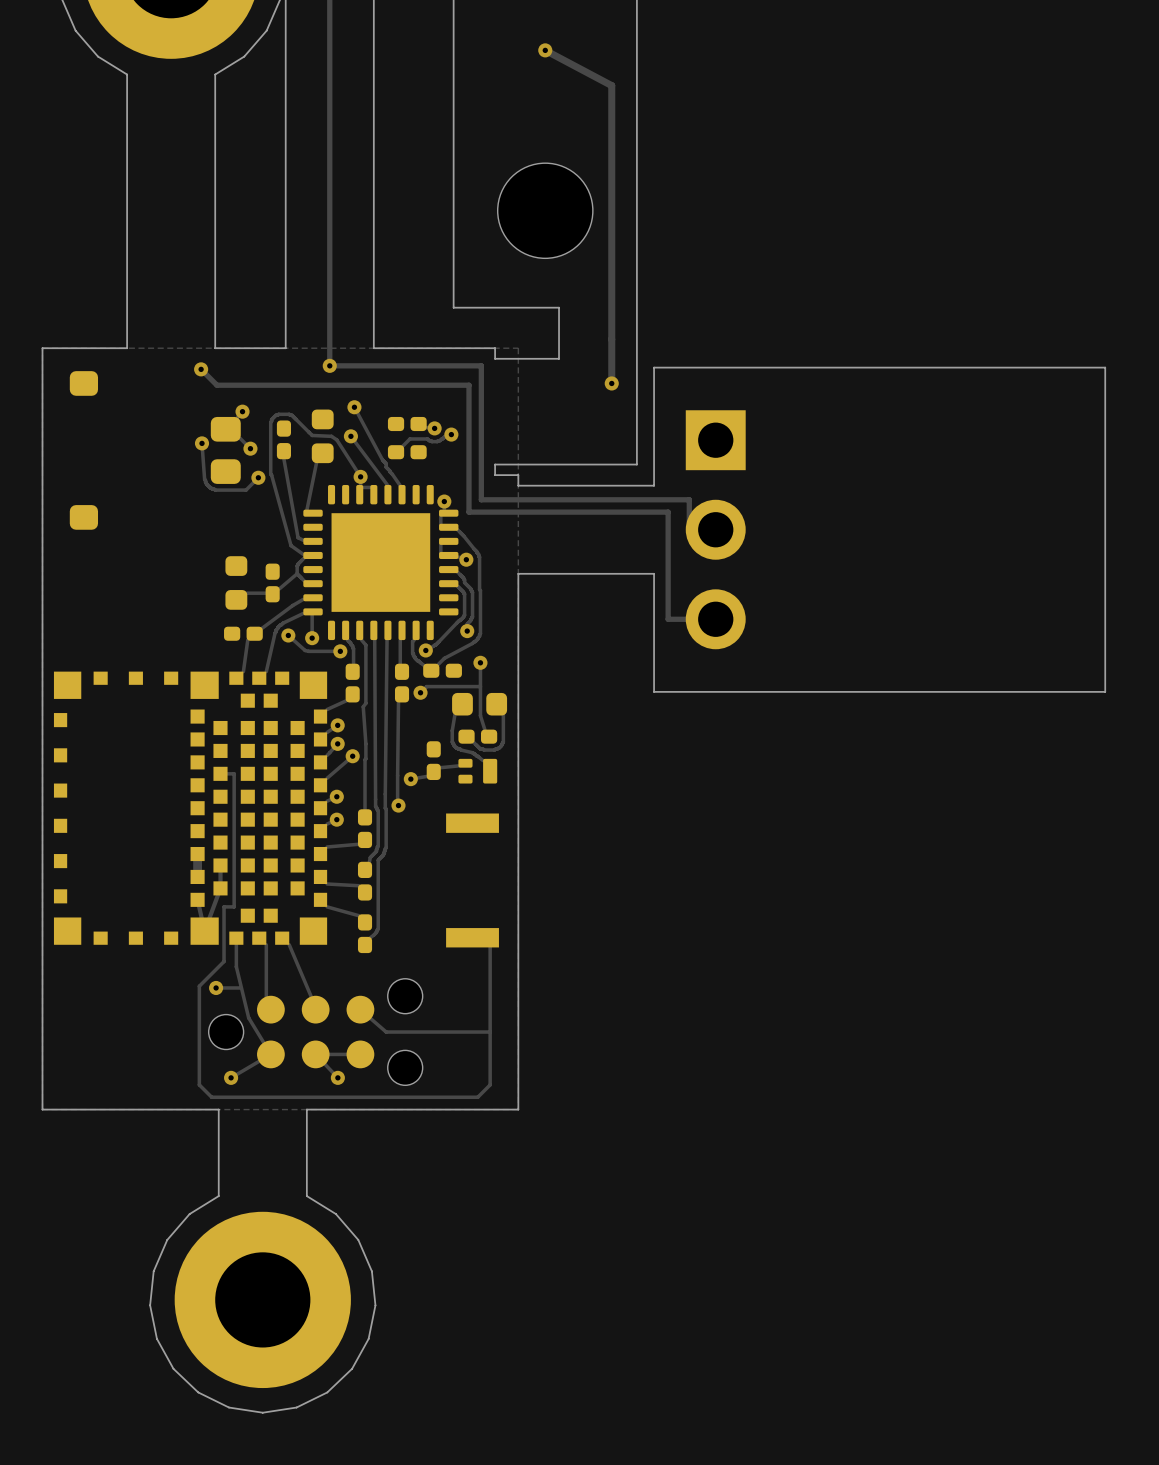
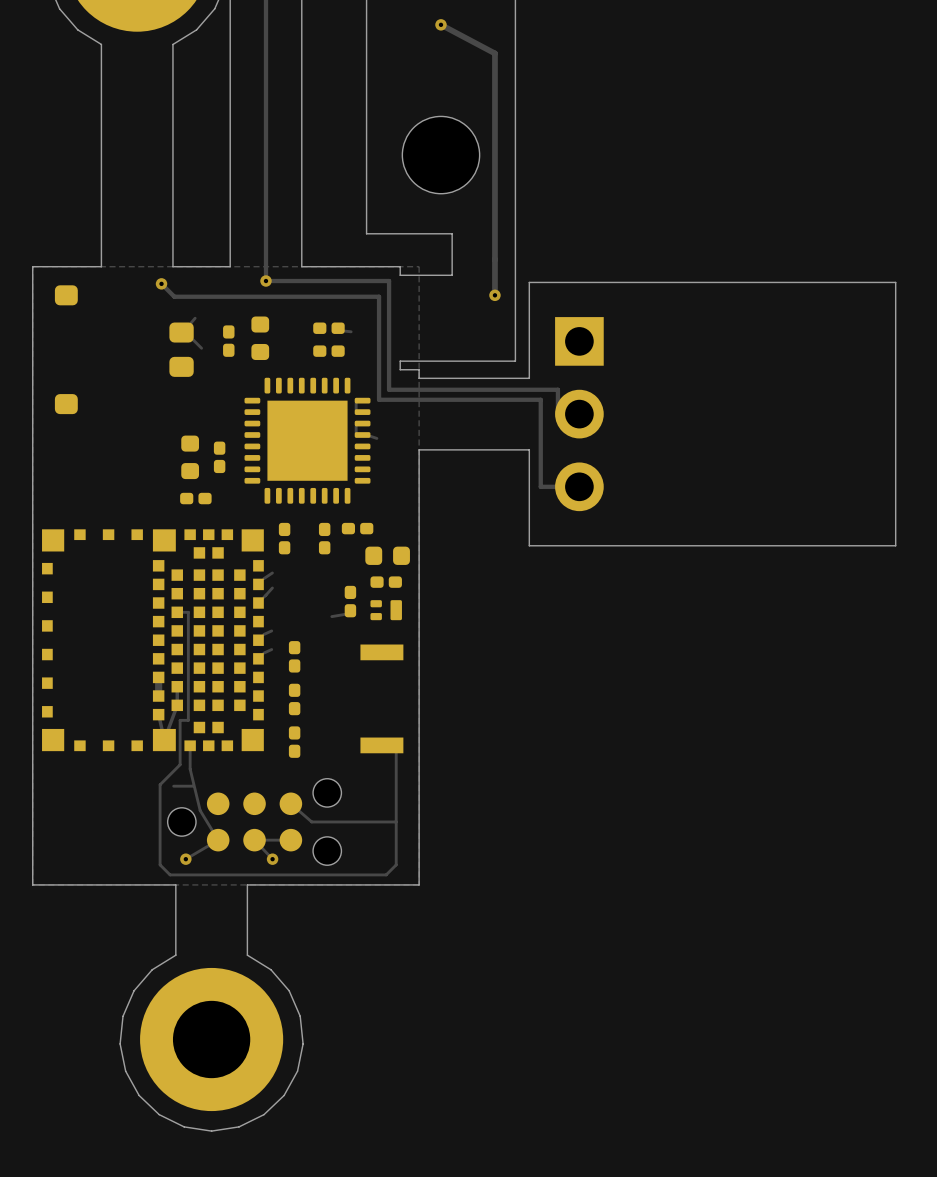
track: (354, 407) (386, 463) (386, 467) (400, 485) -> none
via: (354, 407) -> none
via: (242, 411) -> none
via: (434, 428) -> none
track: (451, 434) (437, 441) (427, 438) (409, 438) (402, 446) -> none
via: (451, 434) -> none
track: (350, 436) (387, 485) -> none
via: (350, 436) -> none
track: (201, 443) (204, 479) (210, 488) (215, 490) (246, 490) (258, 477) -> none
via: (201, 443) -> none
via: (250, 448) -> none
track: (283, 459) (298, 537) (303, 540) -> none
track: (316, 462) (306, 510) -> none
via: (360, 476) -> none
via: (258, 477) -> none
track: (360, 485) (360, 476) (336, 439) (331, 436) (312, 435) (289, 414) (278, 414) (271, 419) (270, 474) (290, 545) (303, 554) -> none
track: (363, 487) (370, 487) -> none
via: (444, 501) -> none
track: (457, 529) (479, 557) (480, 633) (475, 641) (444, 658) (438, 664) -> none
track: (304, 557) (297, 565) (297, 573) -> none
via: (466, 559) -> none
track: (457, 572) (472, 592) (472, 616) (467, 624) (467, 631) -> none
track: (297, 573) (279, 588) -> none
track: (297, 573) (304, 580) -> none
track: (457, 586) (464, 594) (464, 615) (435, 645) (425, 650) -> none
track: (246, 593) (266, 593) -> none
track: (303, 599) (261, 628) -> none
track: (303, 613) (283, 623) (276, 630) (266, 671) -> none
track: (312, 615) (312, 638) -> none
via: (467, 631) -> none
track: (288, 635) (305, 650) (340, 651) -> none
via: (288, 635) -> none
via: (312, 638) -> none
track: (247, 639) (243, 671) -> none
track: (347, 639) (353, 648) (353, 663) -> none
track: (361, 639) (365, 645) (365, 703) (363, 706) (365, 743) (365, 809) -> none
track: (374, 639) (375, 806) (378, 810) (378, 846) (369, 861) -> none
track: (387, 639) (386, 847) (383, 854) (378, 860) (378, 928) (370, 937) -> none
track: (400, 639) (400, 663) -> none
track: (414, 639) (412, 641) (413, 655) (424, 665) -> none
via: (425, 650) -> none
via: (340, 651) -> none
track: (480, 662) (480, 715) (484, 729) -> none
via: (480, 662) -> none
track: (480, 686) (426, 686) (420, 692) -> none
via: (420, 692) -> none
track: (346, 700) (327, 709) -> none
track: (398, 702) (398, 805) -> none
track: (454, 714) (452, 730) (454, 745) (458, 749) (474, 753) (483, 760) -> none
track: (503, 714) (503, 742) (498, 748) (483, 750) (473, 742) -> none
via: (337, 725) -> none
via: (337, 743) -> none
track: (352, 756) (327, 778) -> none
via: (352, 756) -> none
track: (458, 765) (440, 767) -> none
via: (410, 779) -> none
via: (336, 796) -> none
via: (398, 805) -> none
via: (336, 819) -> none
track: (357, 844) (327, 846) -> none
track: (327, 883) (358, 885) -> none
track: (327, 906) (358, 915) -> none
track: (266, 944) (266, 996) -> none
track: (289, 944) (311, 996) -> none
via: (216, 987) -> none

